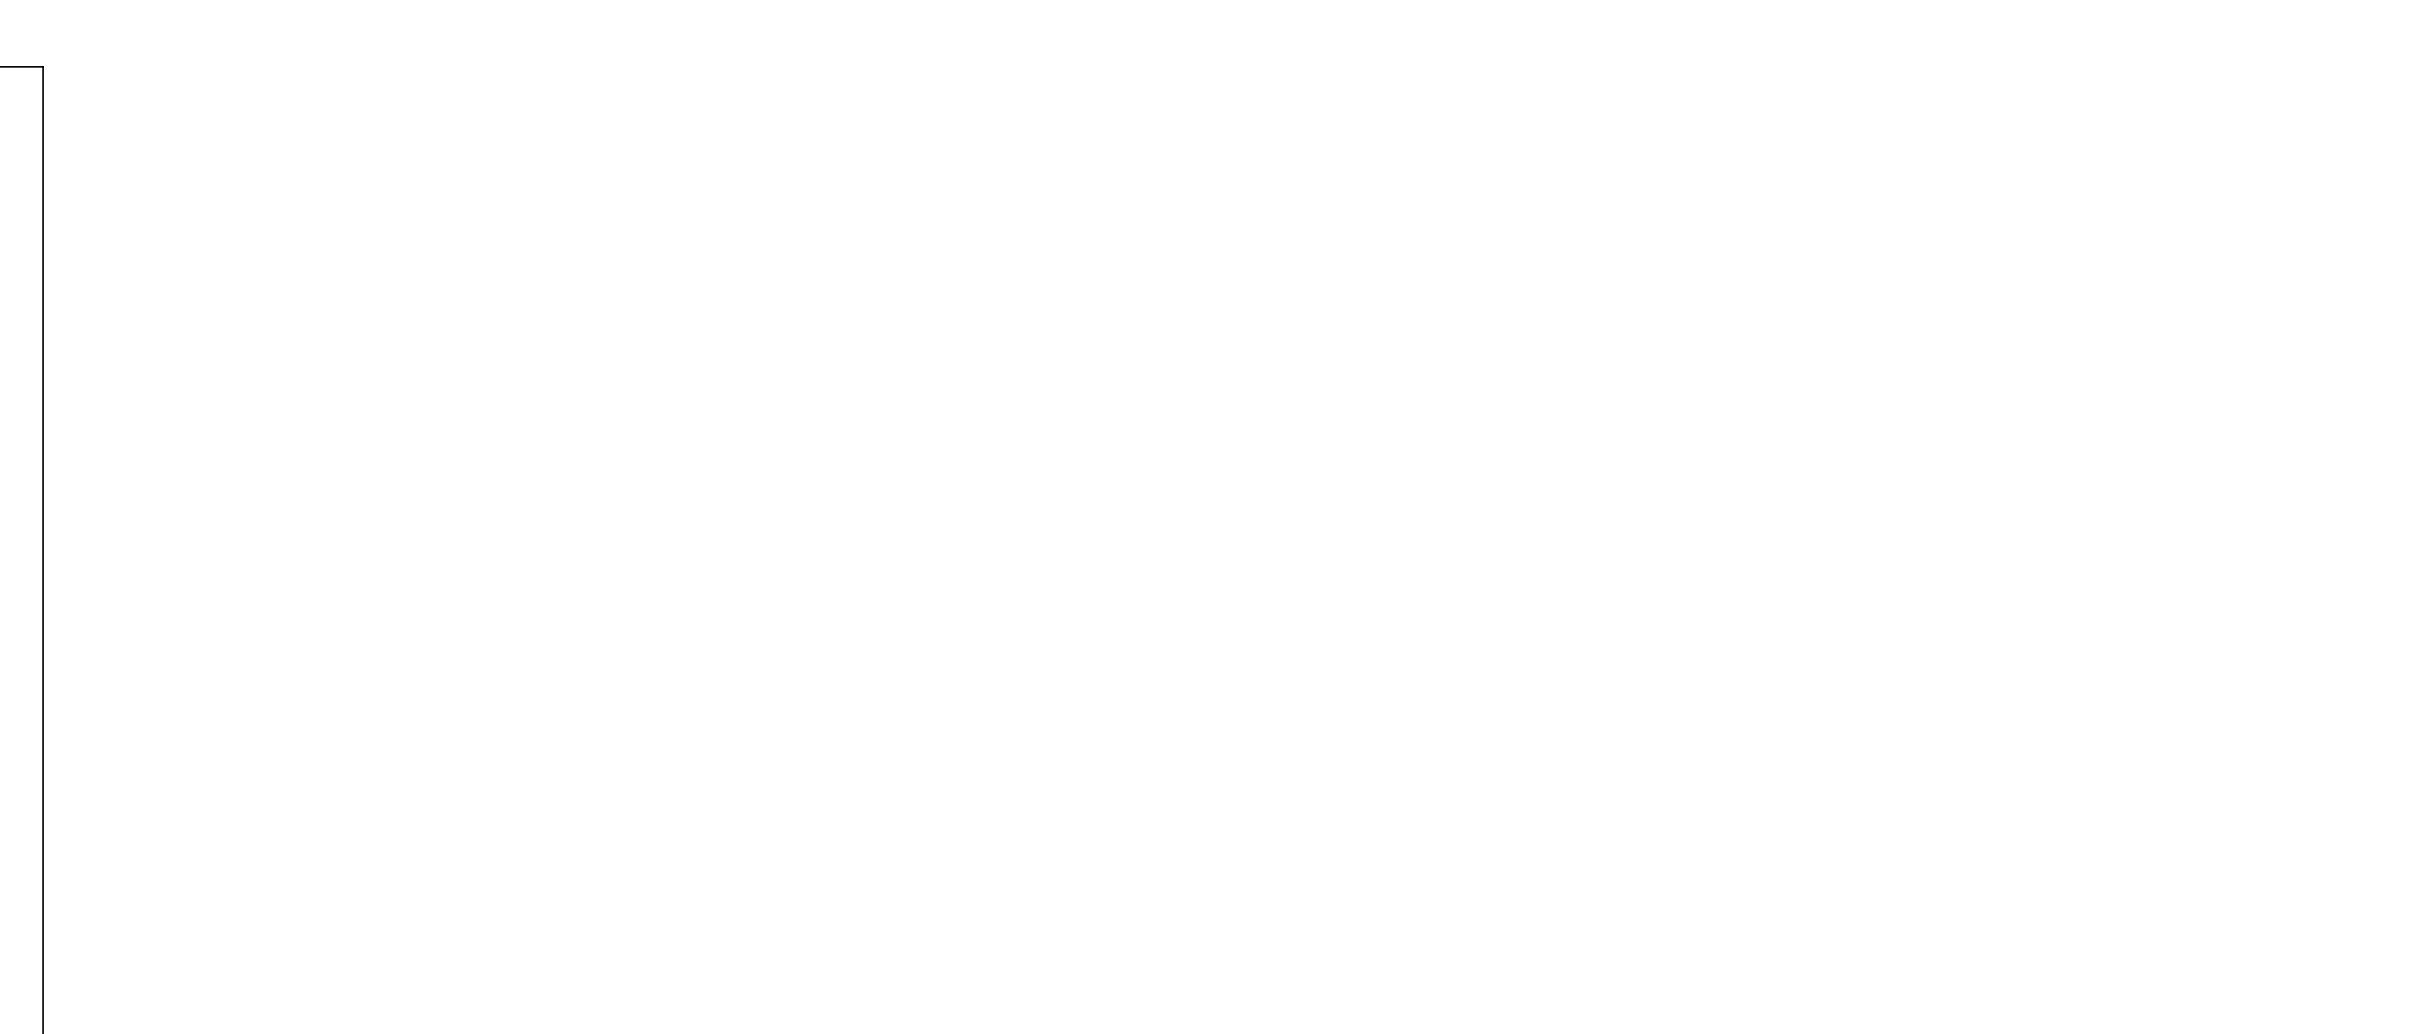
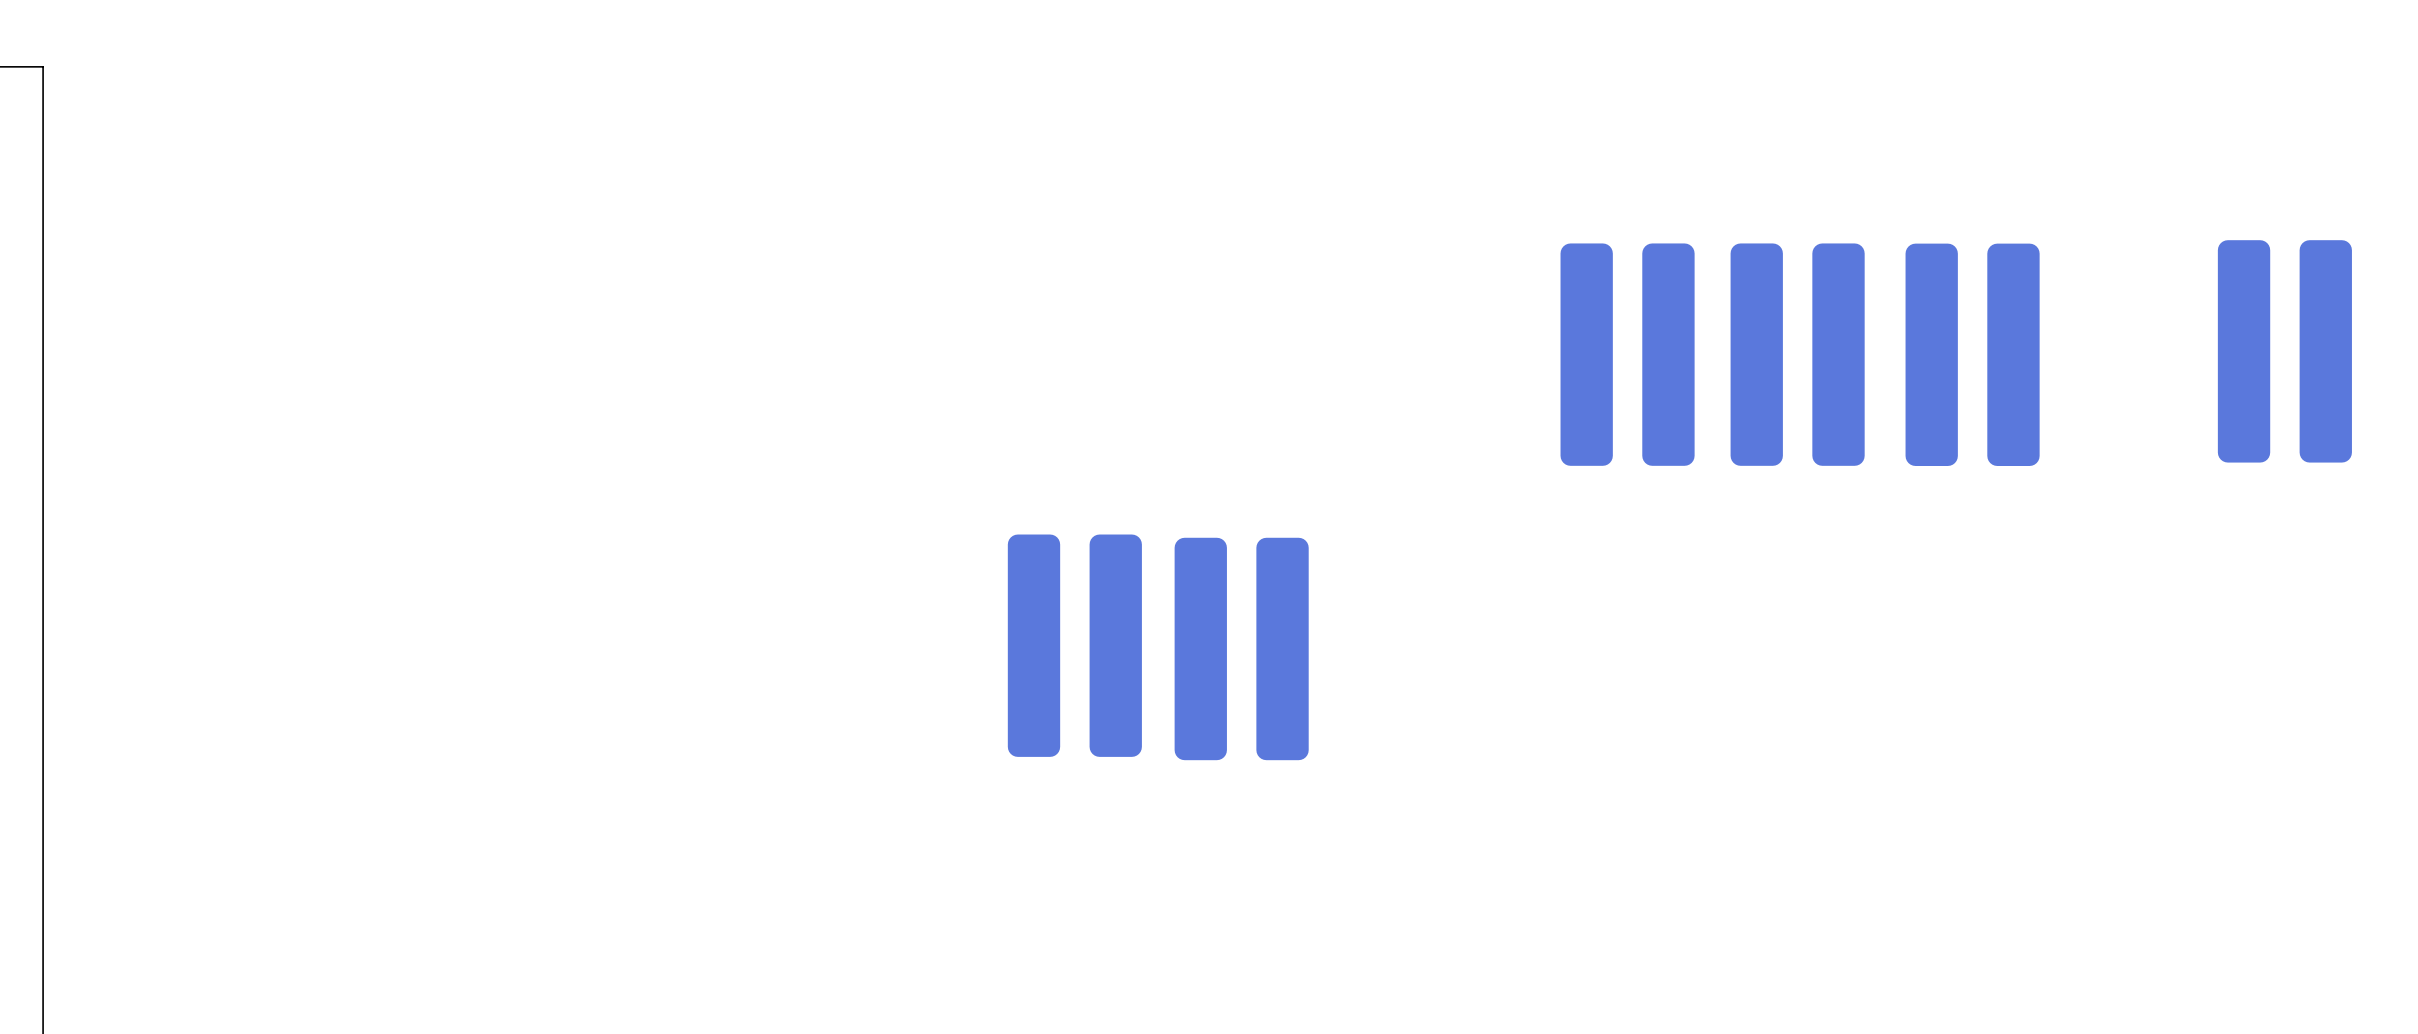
part: none -> (2284, 351)
part: none -> (1627, 354)
part: none -> (1797, 354)
part: none -> (1972, 354)
part: none -> (1074, 645)
part: none -> (1241, 648)

